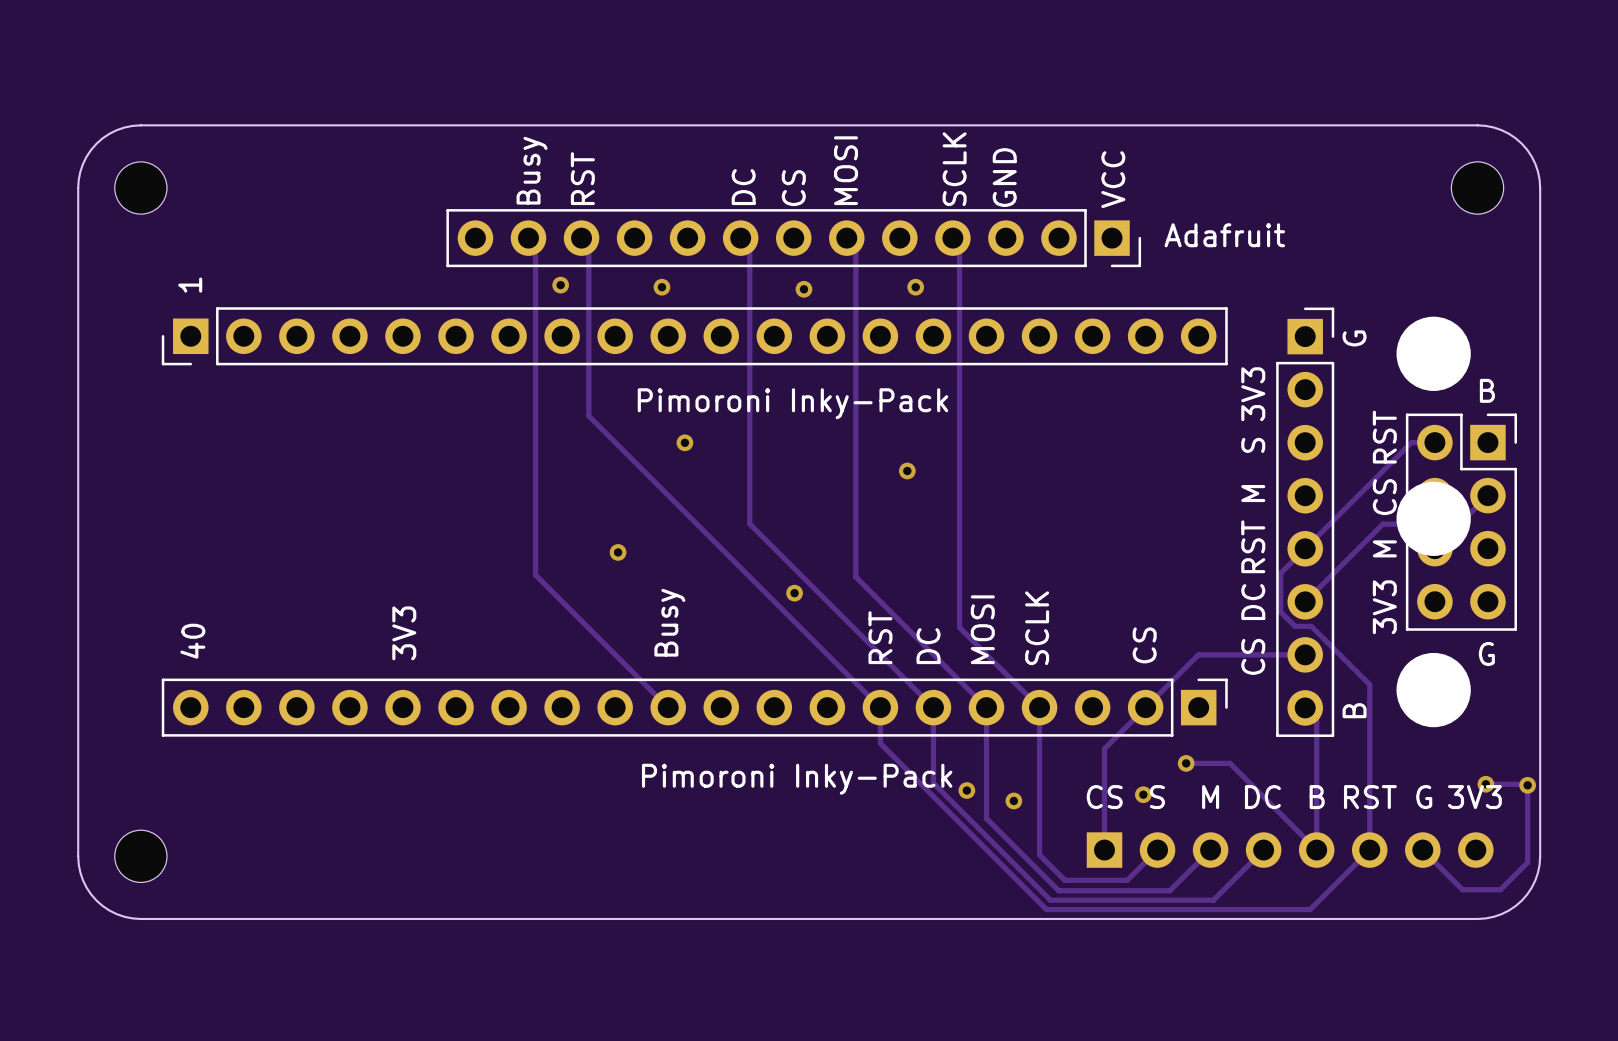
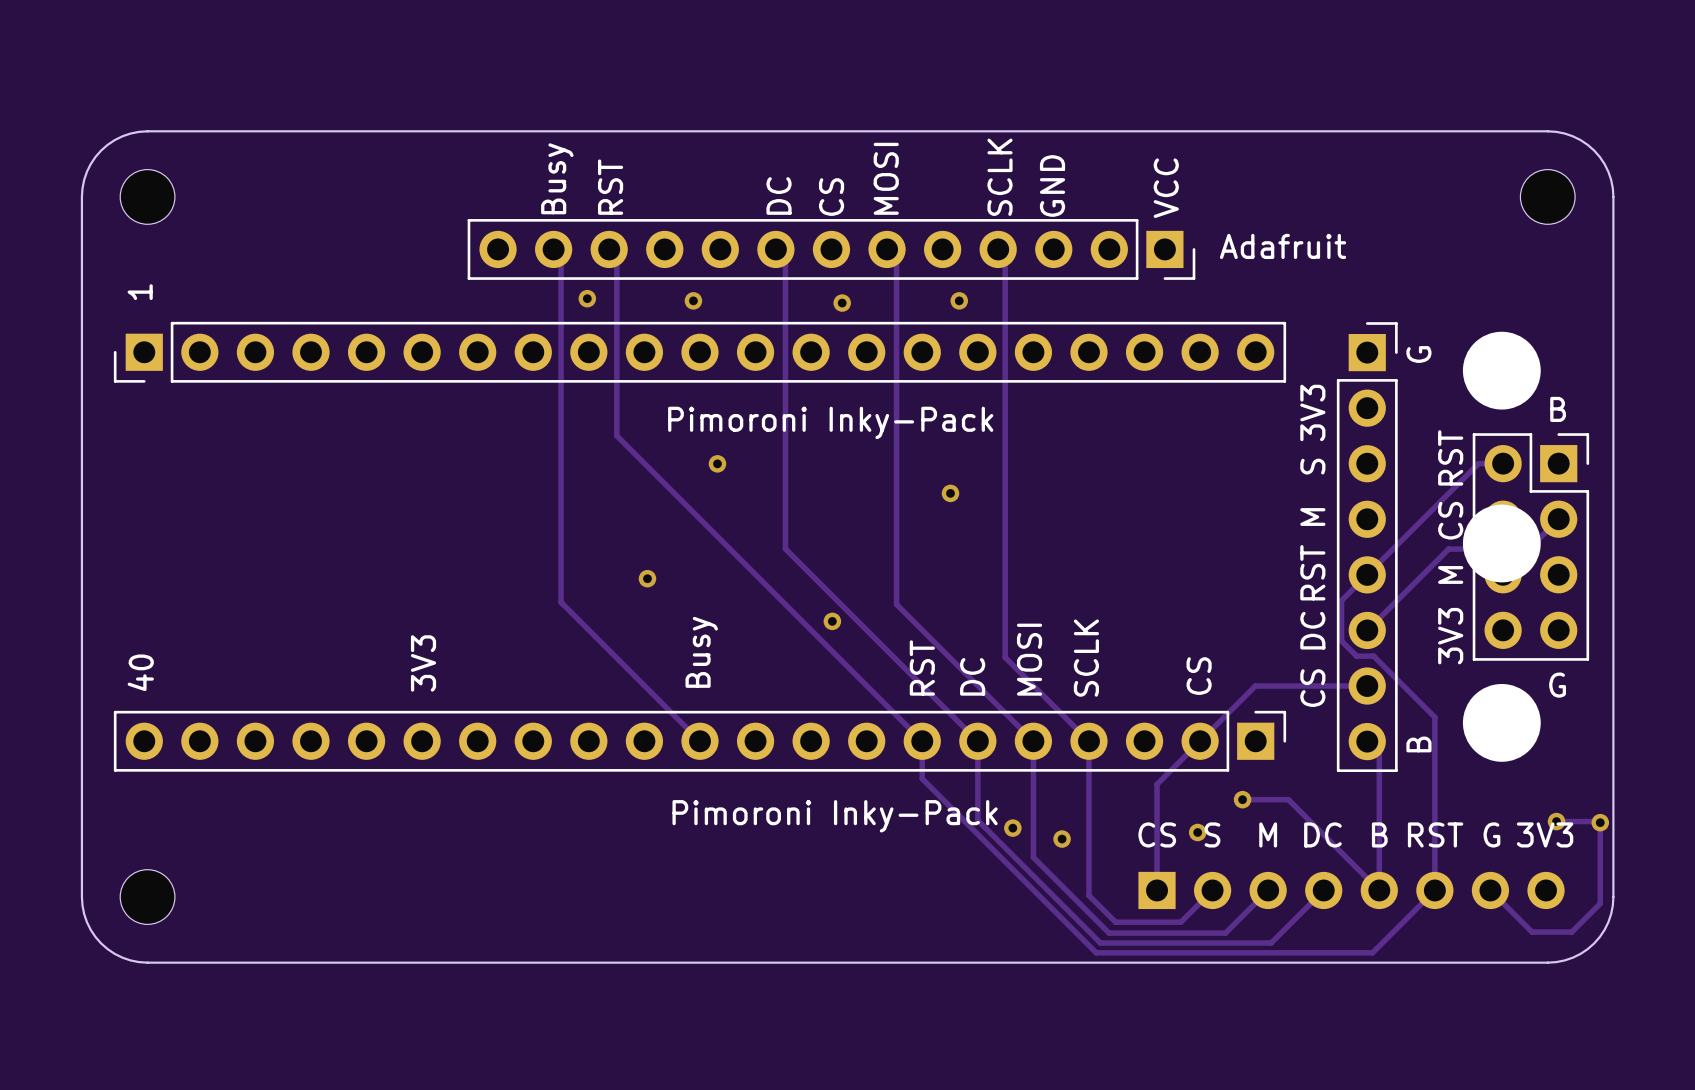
text position: 1 (190, 285) -> 1 (140, 292)
part: none -> (699, 352)
part: (694, 336) -> none
text position: 40 (192, 641) -> 40 (140, 672)
part: none -> (699, 741)
part: (694, 707) -> none

